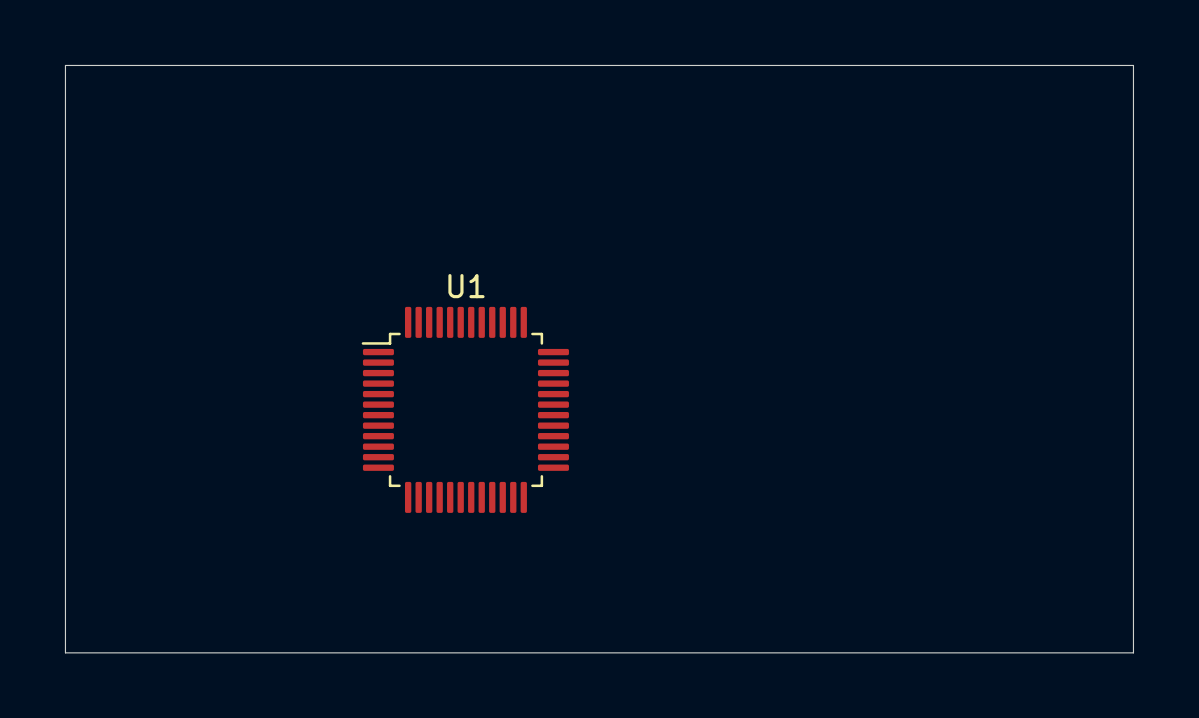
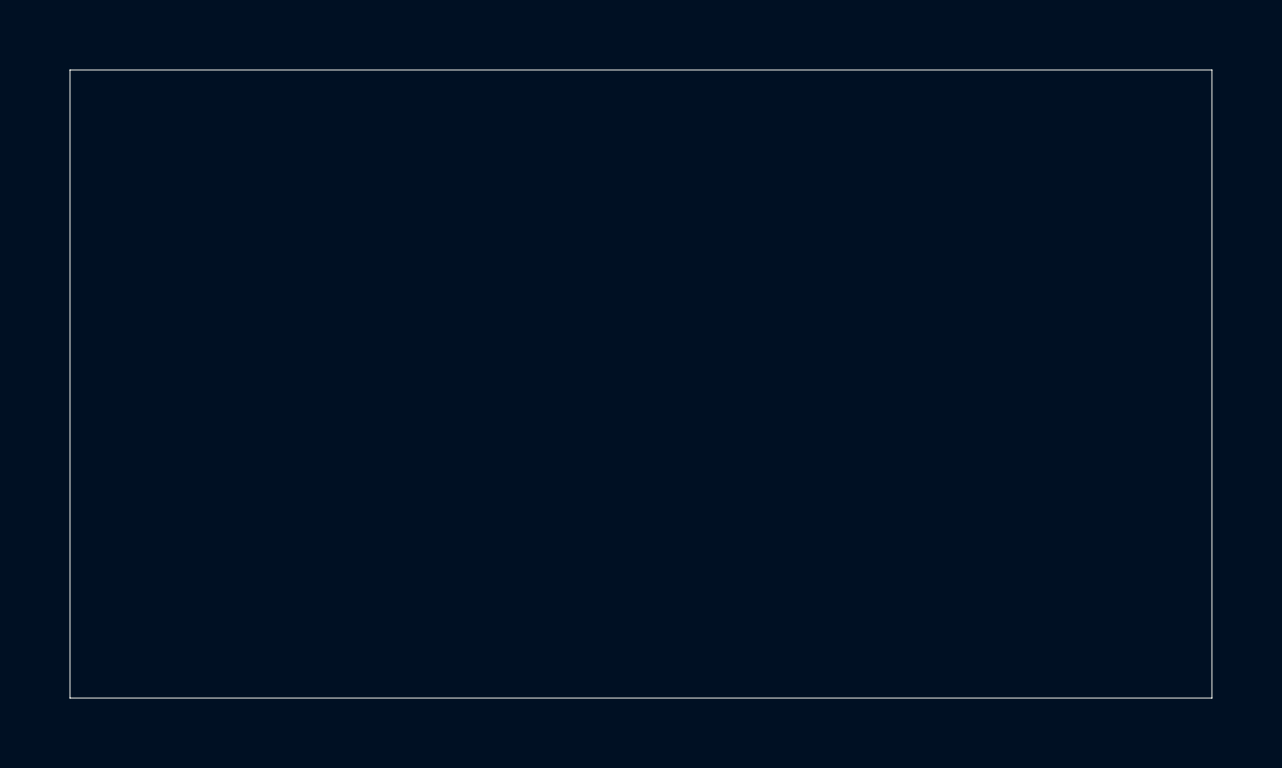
U1: (465, 409) -> none

